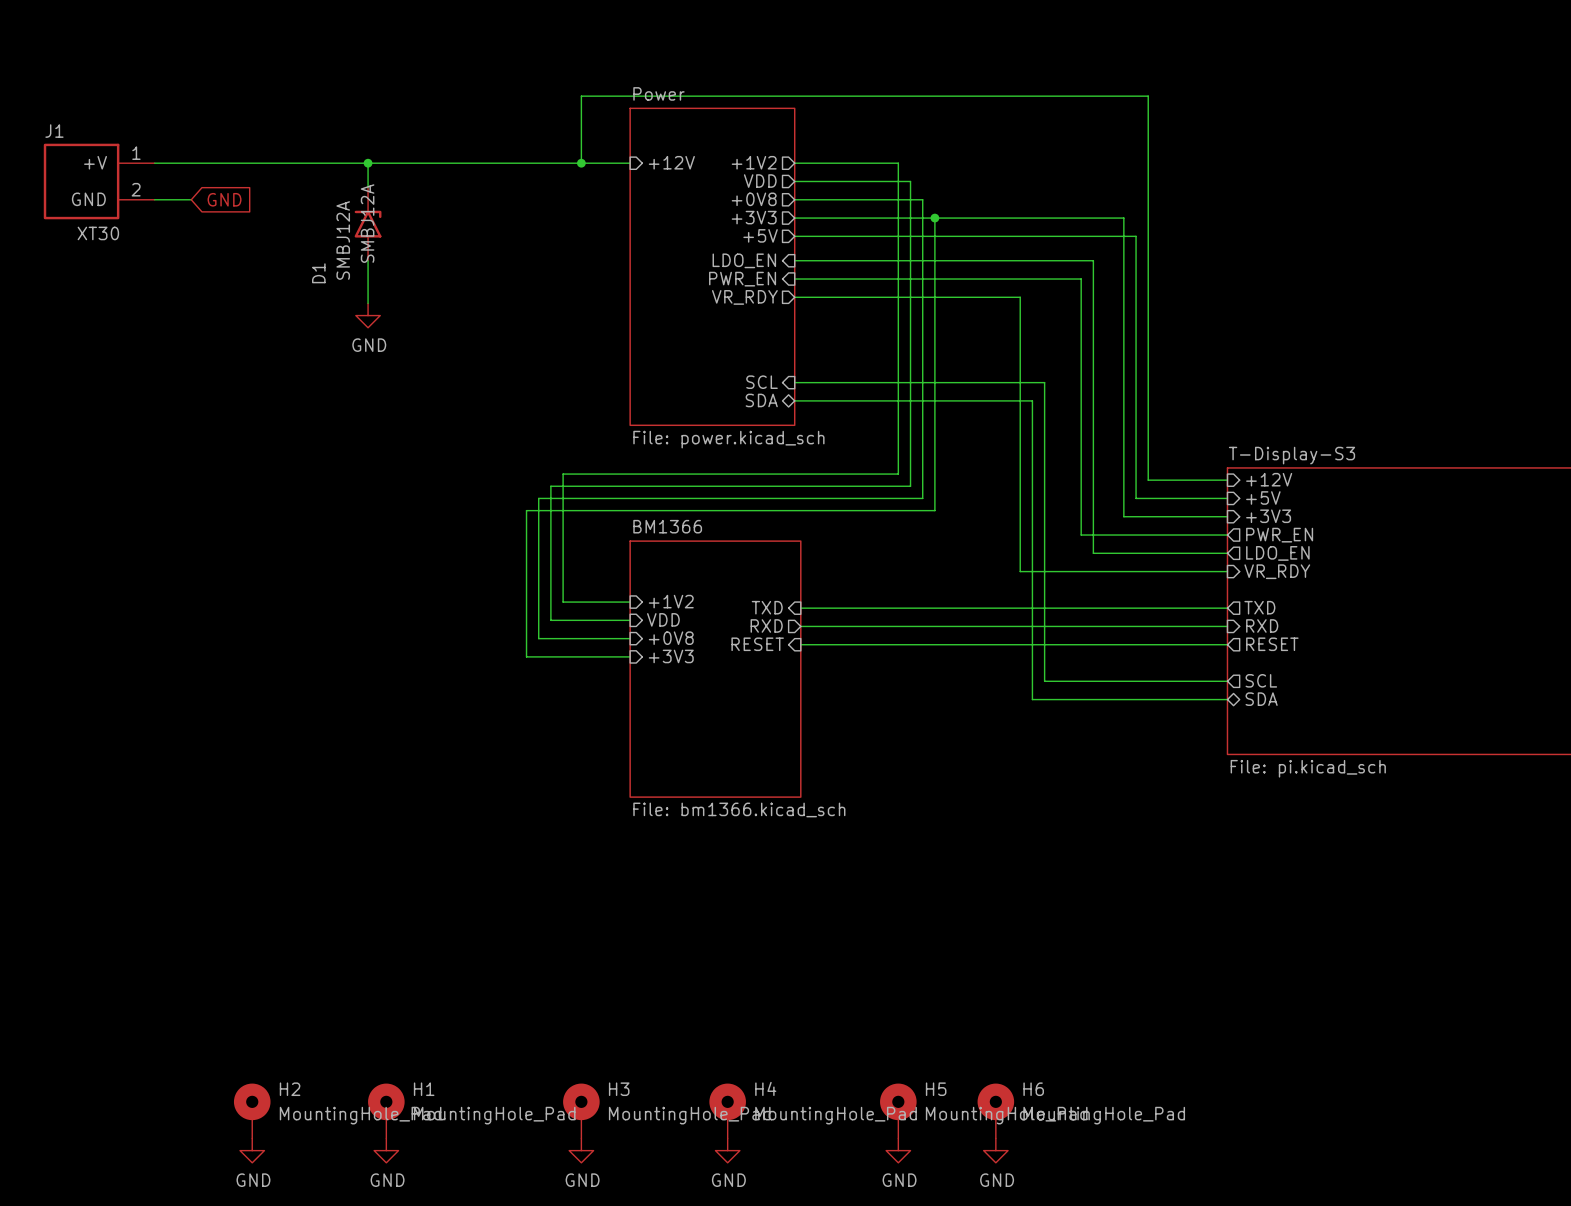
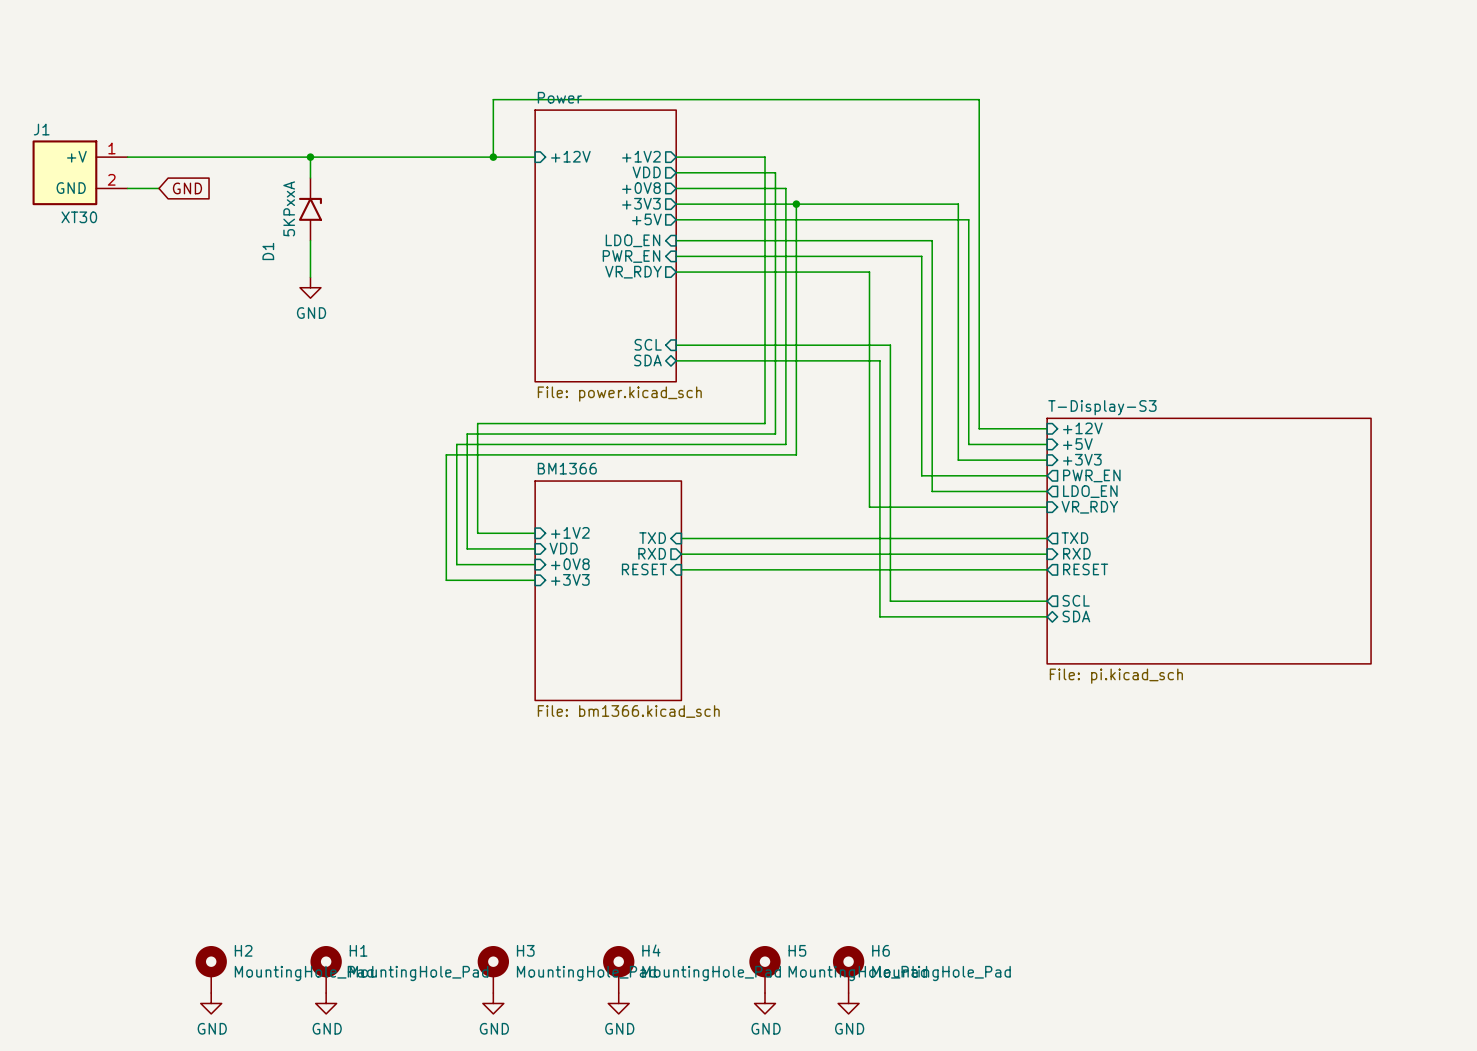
D1 text: SMBJ12A (367, 223) -> none
D1 value: SMBJ12A (343, 240) -> 5KPxxA (289, 208)

